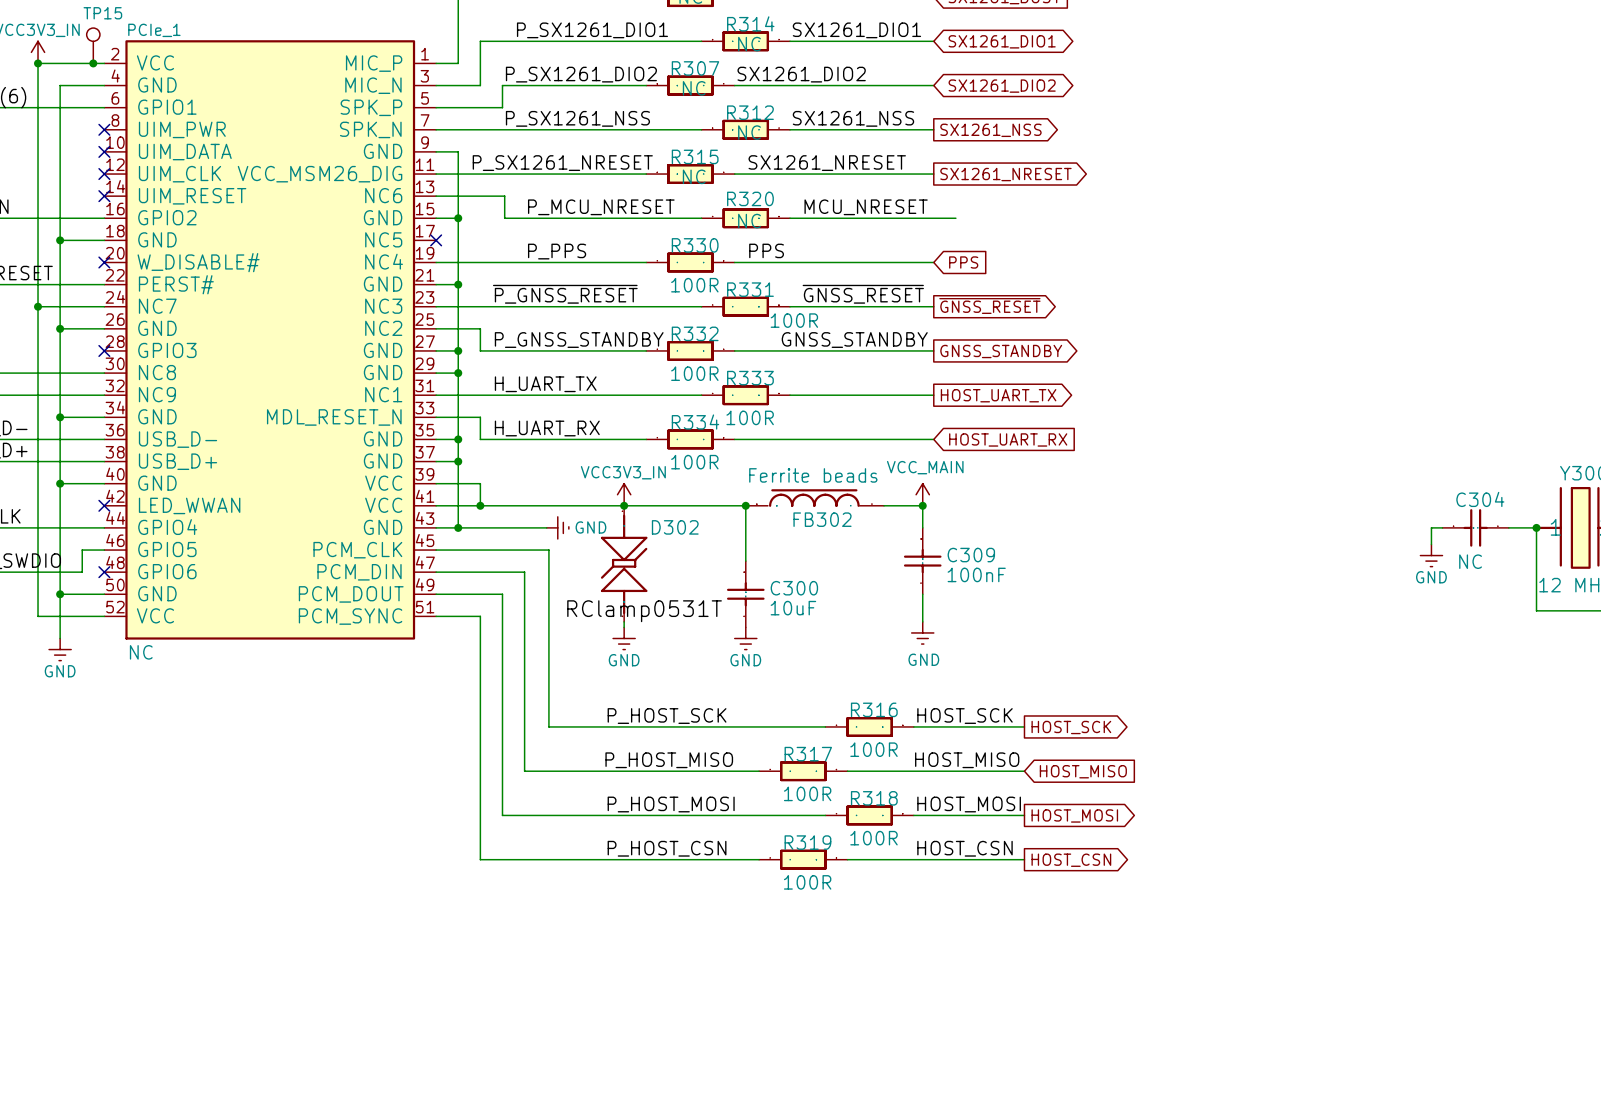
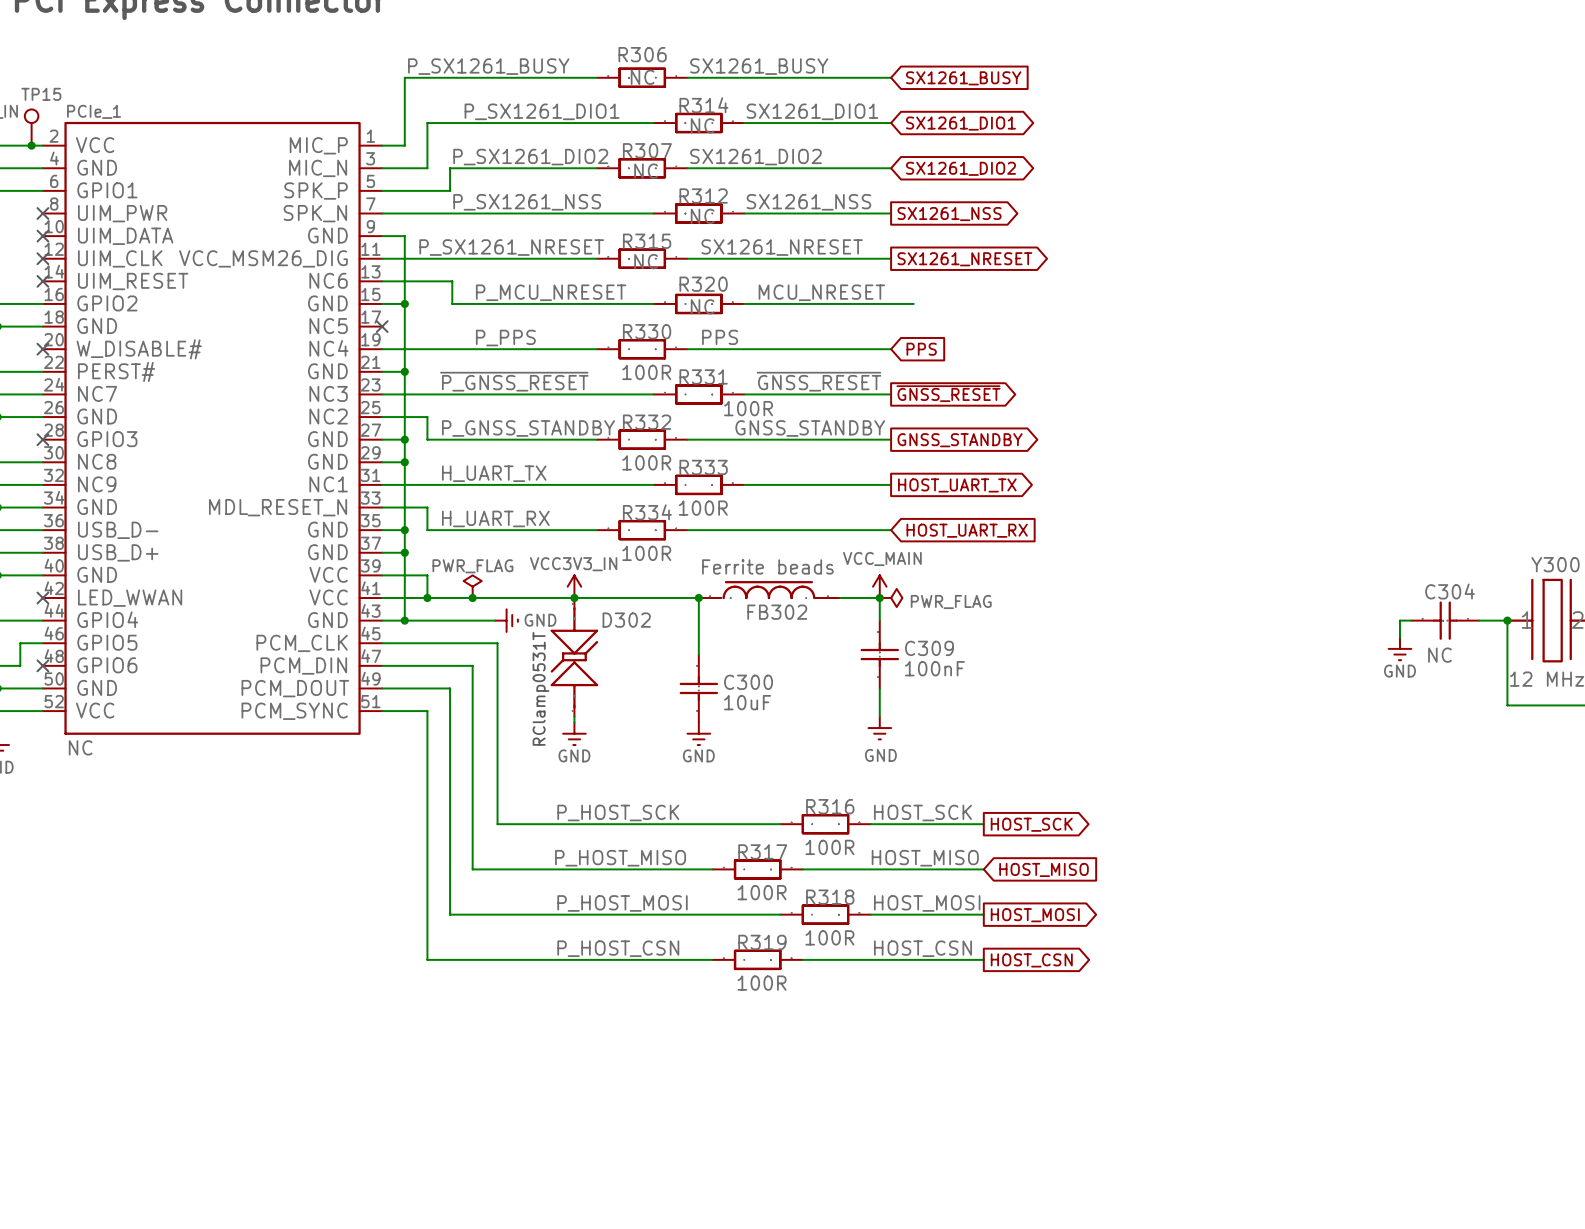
power symbol: none -> PWR_FLAG (472, 586)
junction: none -> (472, 598)
power symbol: none -> PWR_FLAG (891, 598)
text: none -> RClamp0531T (541, 688)
label: RClamp0531T (644, 611) -> none

